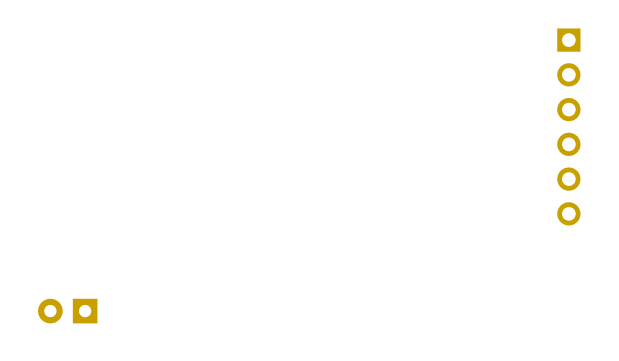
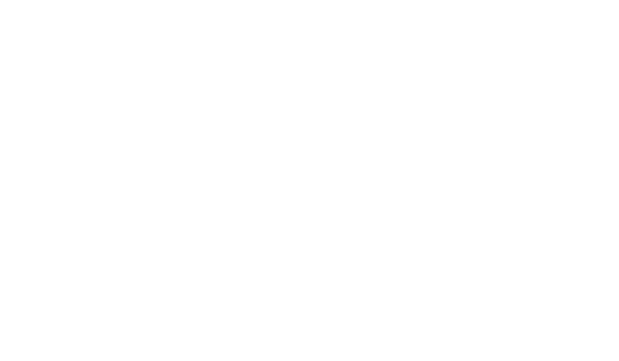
part: (568, 126) -> none
part: (67, 311) -> none

